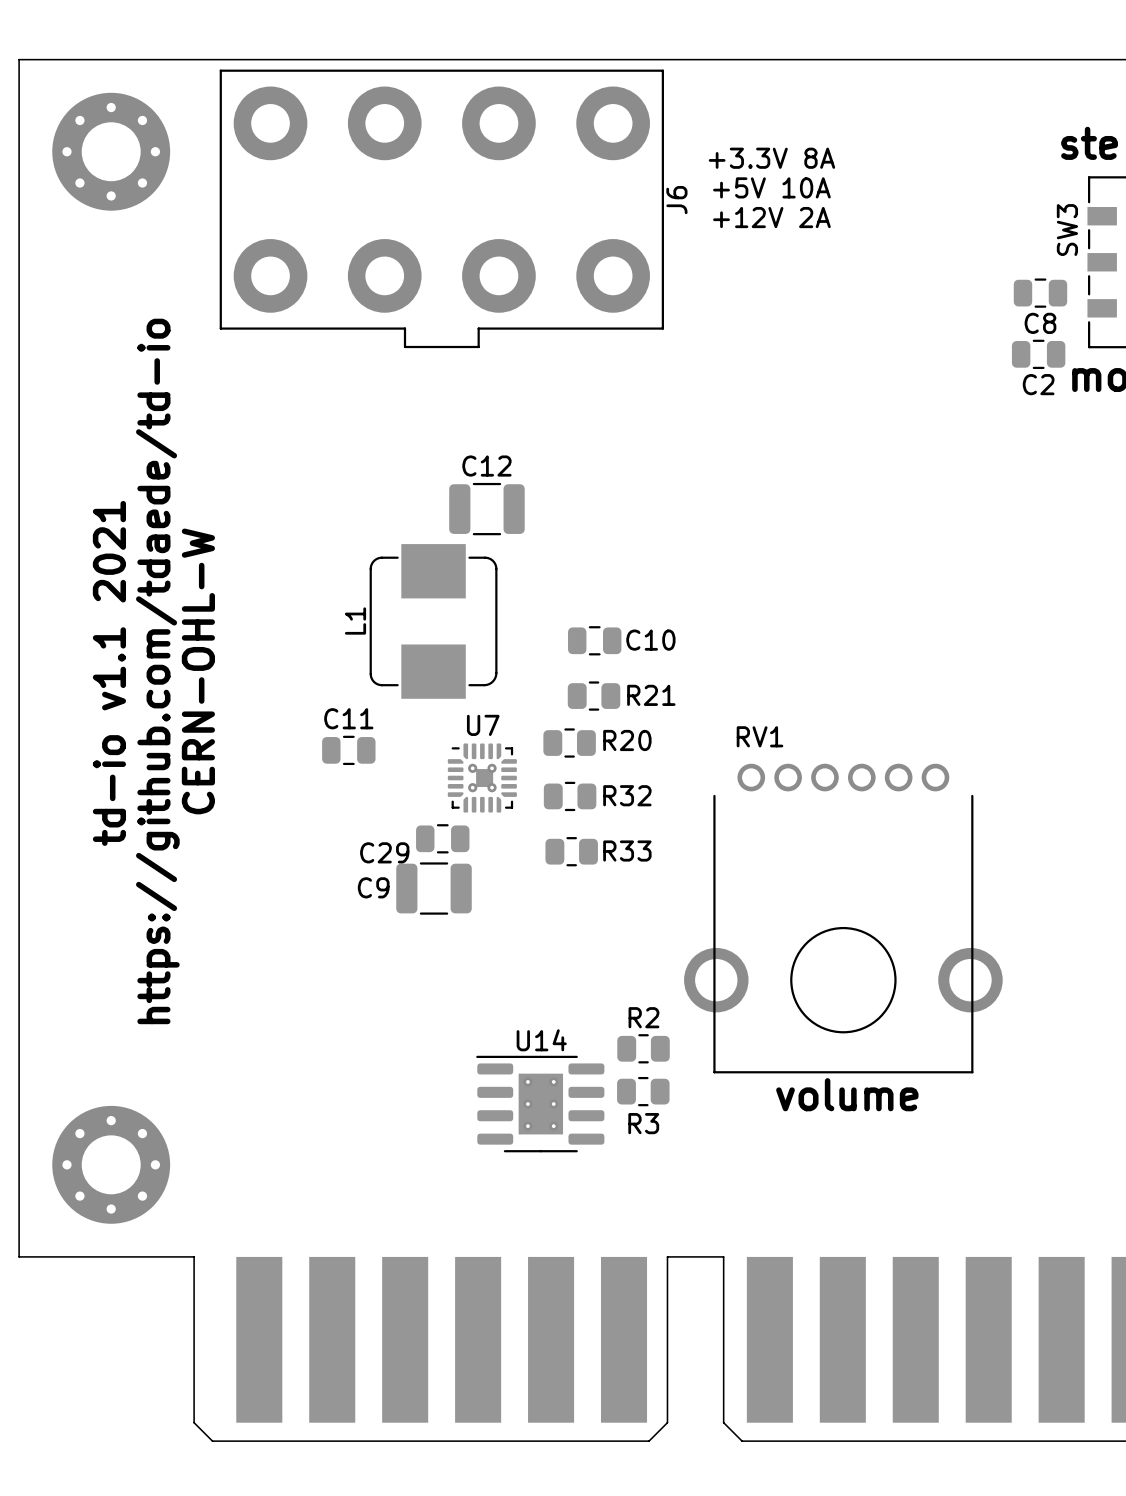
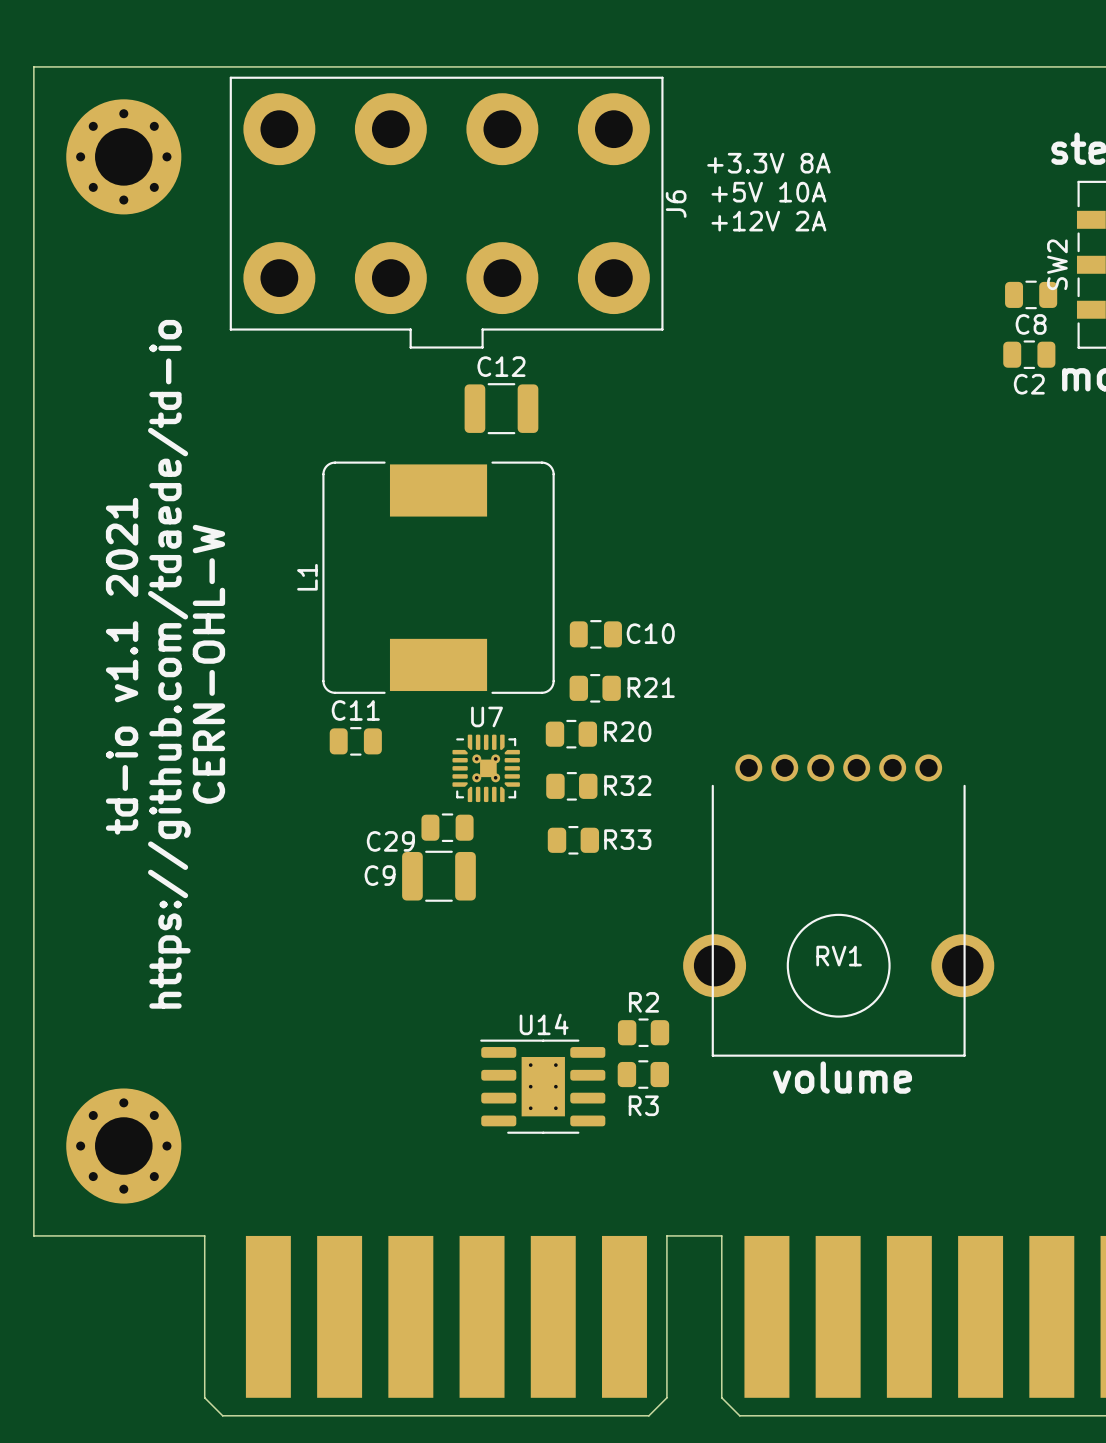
SW3 name: SW3 (1067, 230) -> SW2 (1057, 264)
C12 position: (486, 509) -> (501, 408)
L1 footprint: [369, 544, 498, 699] -> [322, 461, 555, 694]
L1 name position: L1 (355, 621) -> L1 (307, 577)
RV1 name position: RV1 (760, 736) -> RV1 (839, 956)

